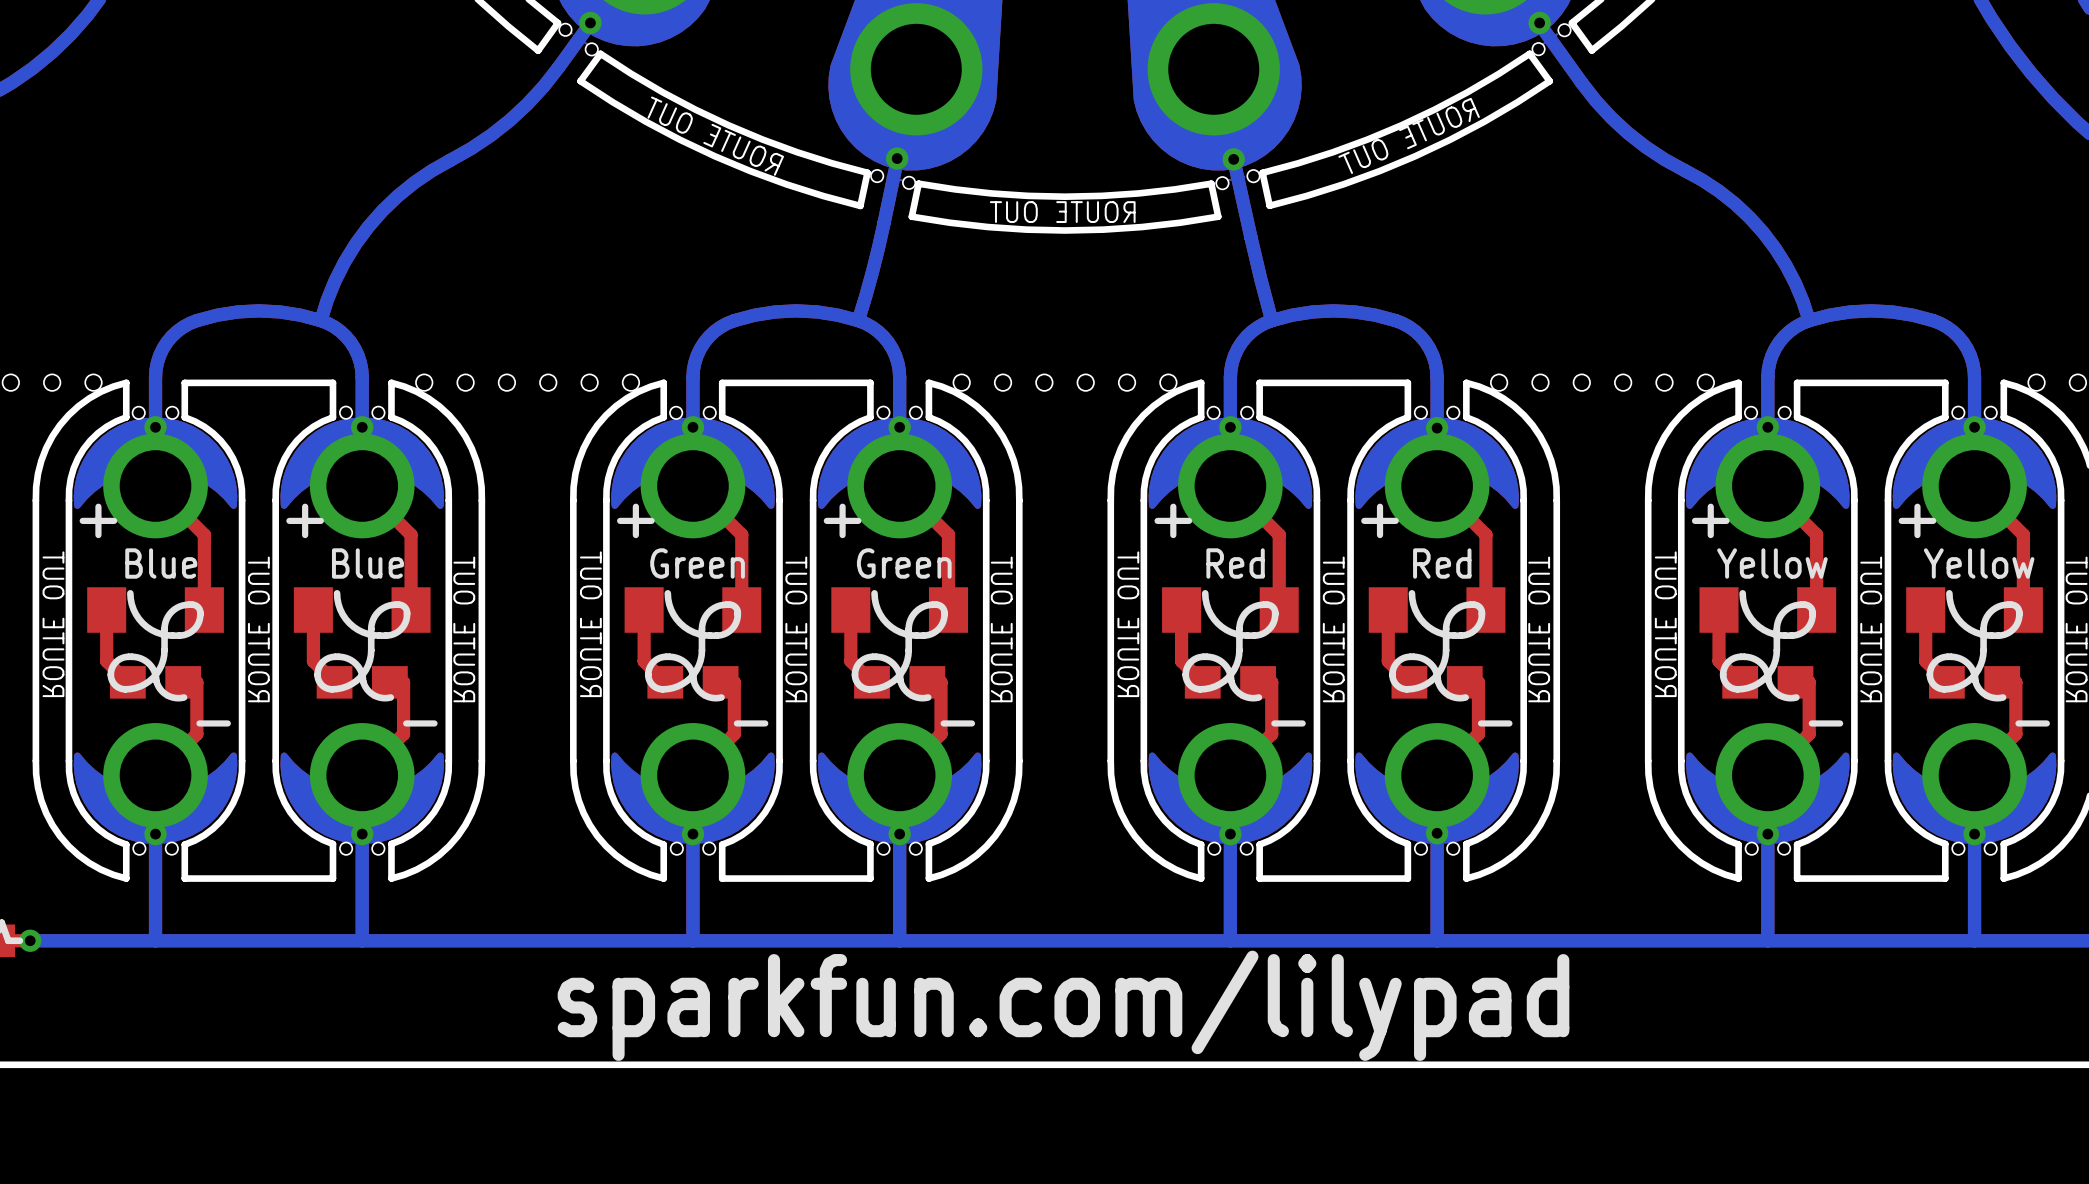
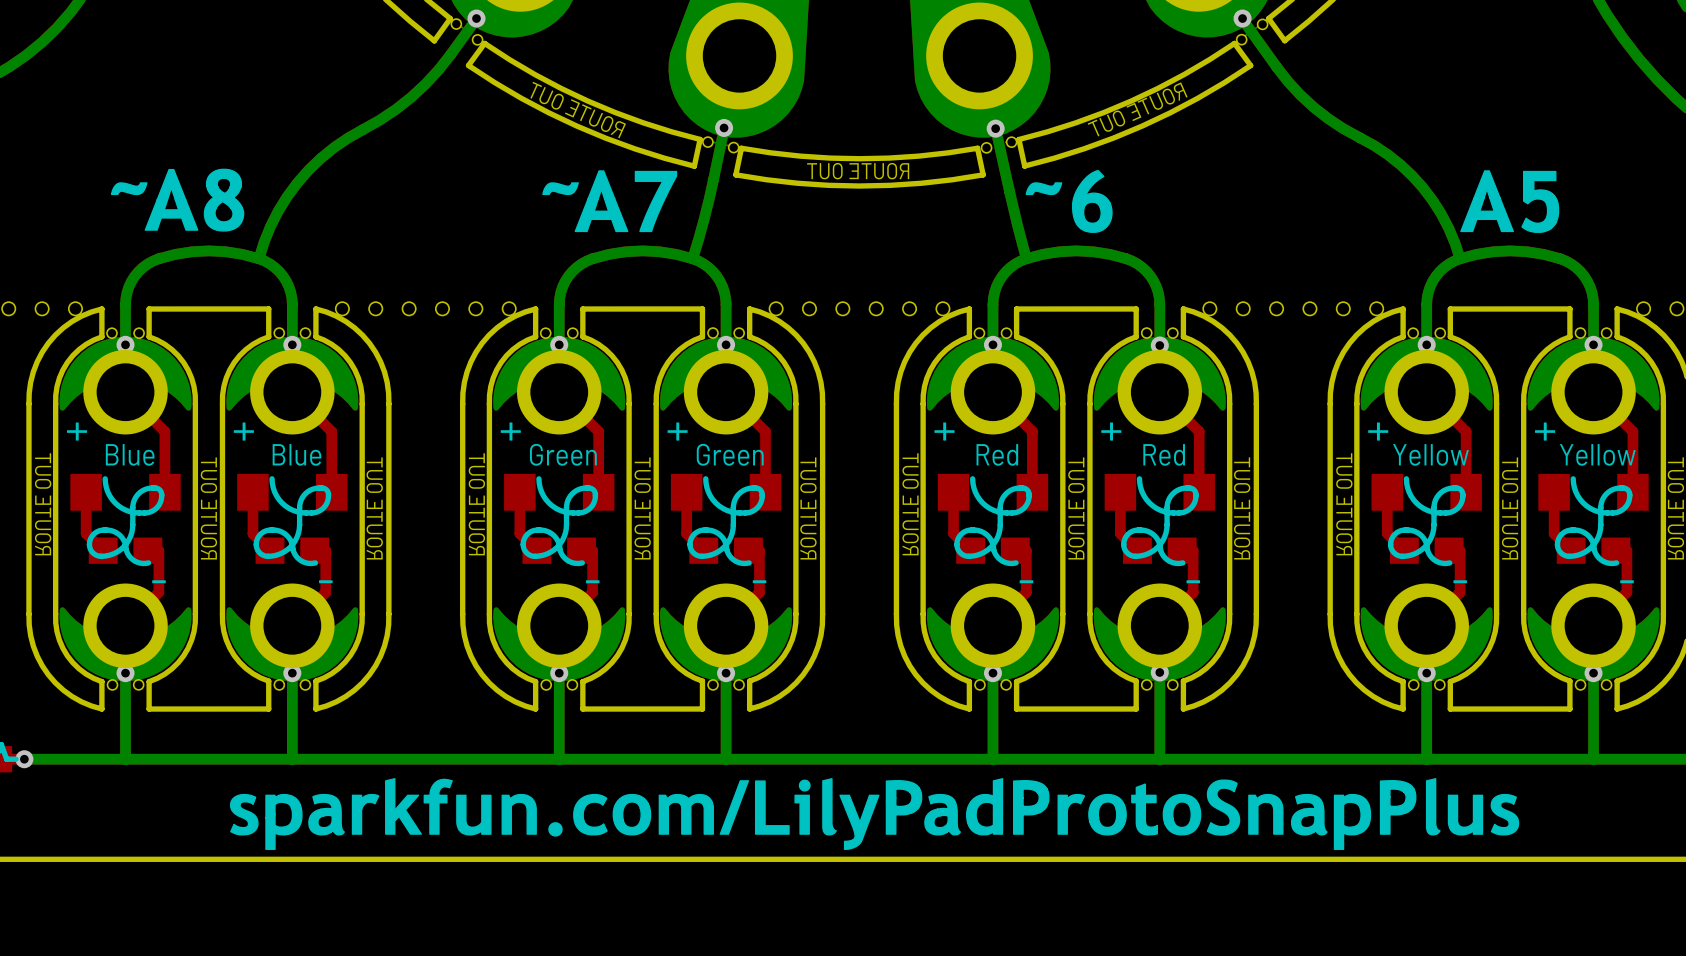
drawing: none -> [110, 168, 245, 232]
drawing: none -> [1025, 169, 1113, 233]
drawing: none -> [542, 170, 678, 233]
drawing: none -> [1460, 170, 1560, 233]
drawing: none -> [230, 778, 1520, 850]
text: sparkfun.com/lilypad (1063, 1005) -> none

